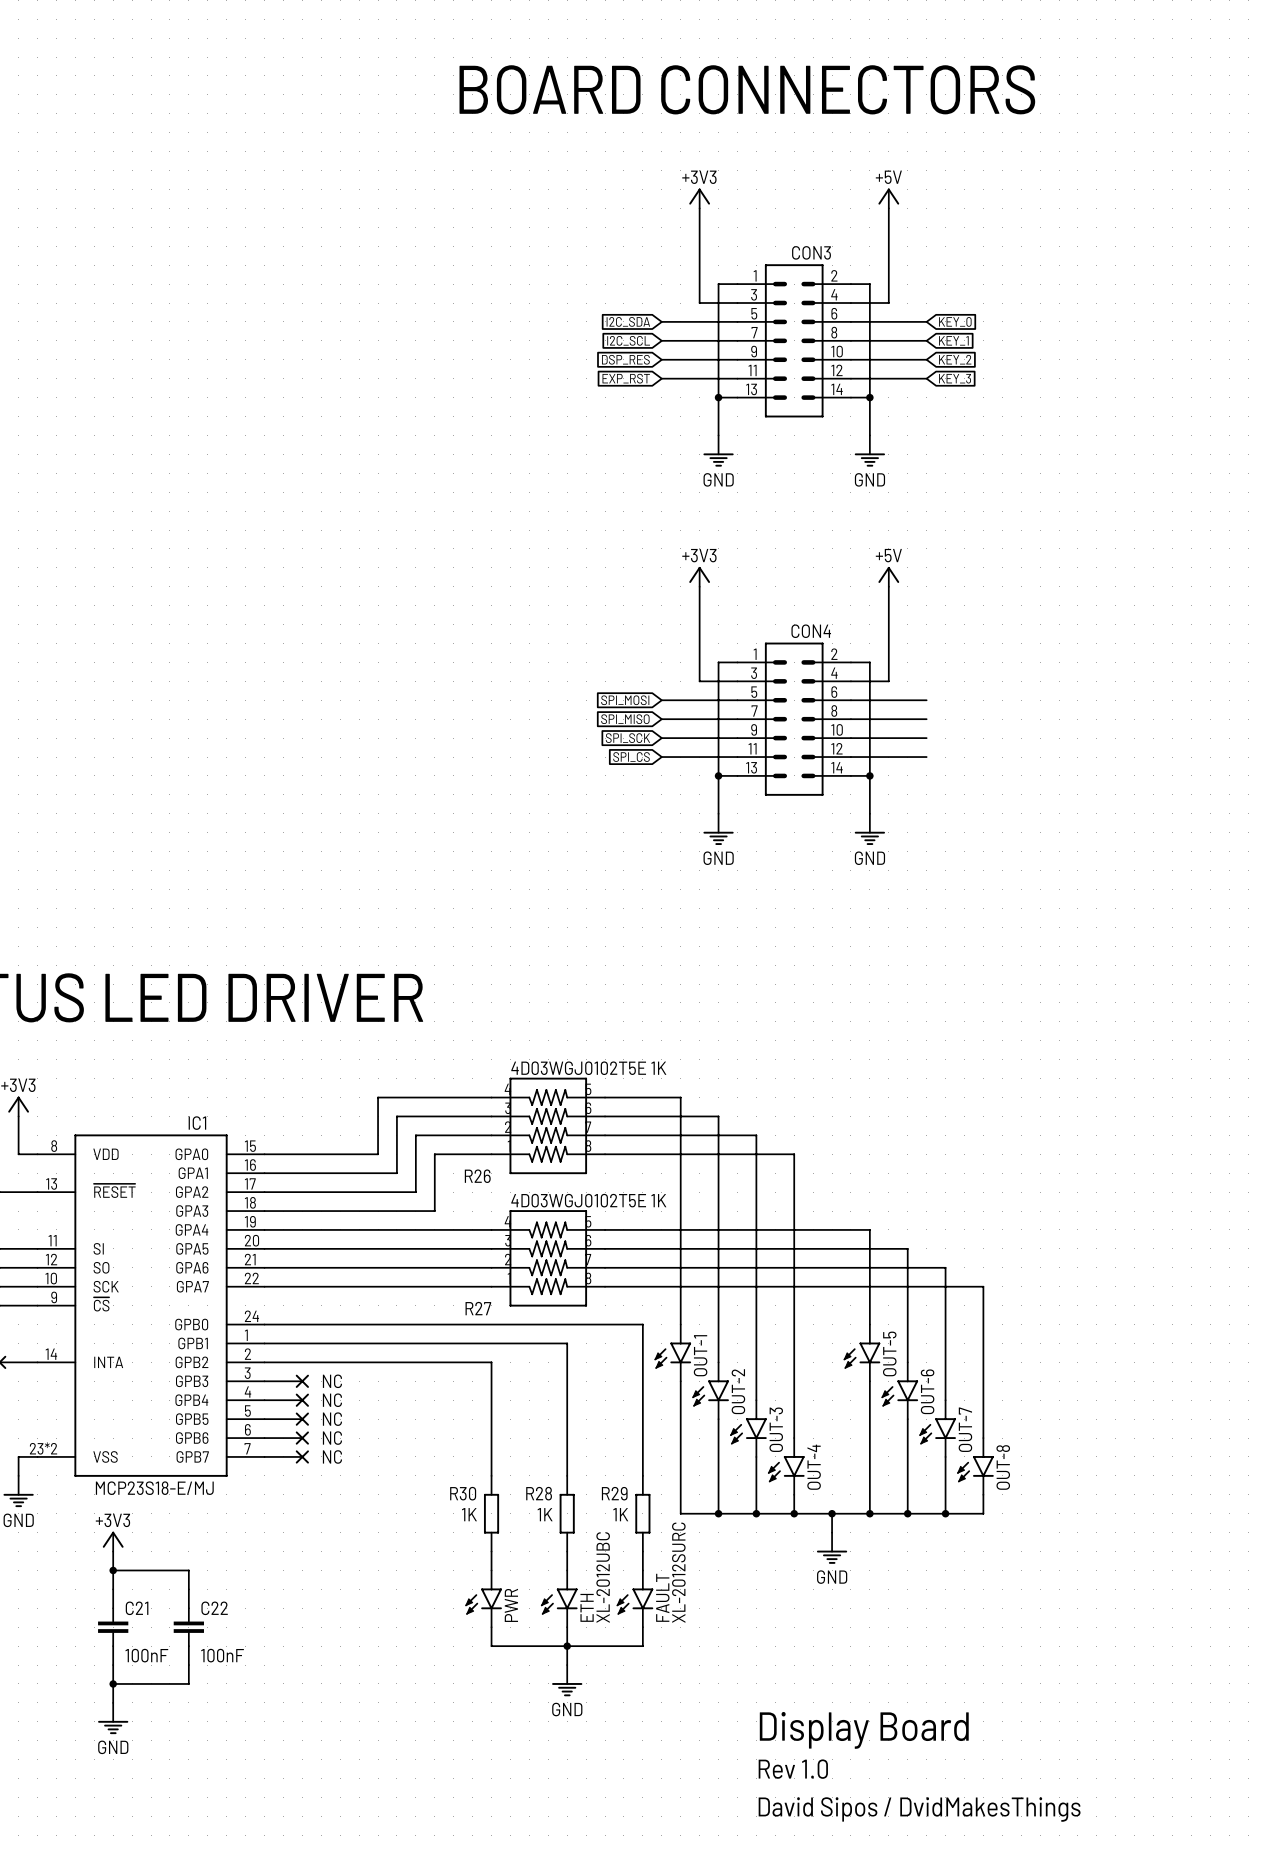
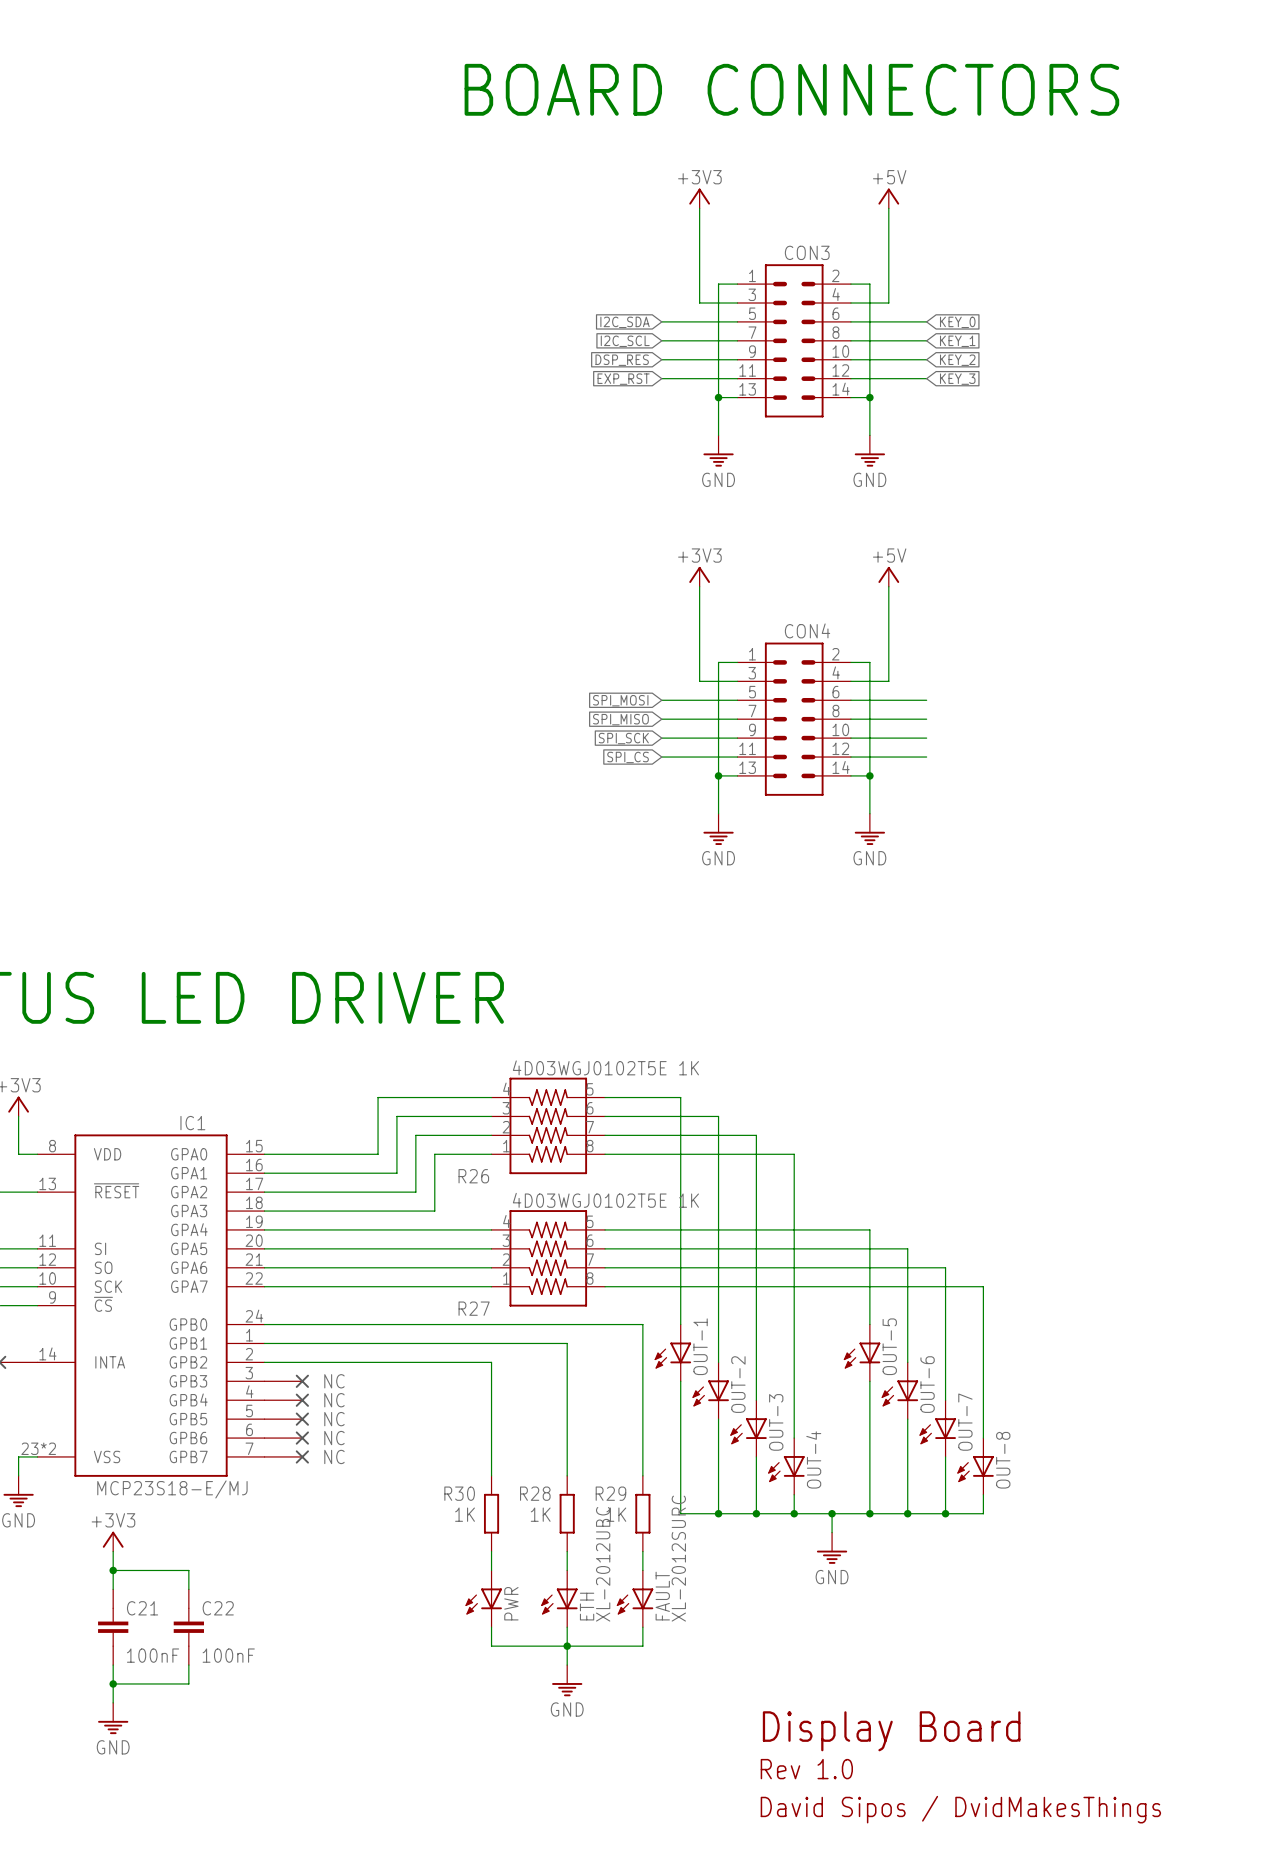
OUT-1 symbol: [654, 1324, 692, 1382] -> [654, 1324, 692, 1382]
OUT-5 symbol: [843, 1324, 881, 1382] -> [843, 1324, 881, 1382]
OUT-2 symbol: [692, 1362, 729, 1420] -> [692, 1362, 729, 1420]
OUT-6 symbol: [881, 1362, 919, 1420] -> [881, 1362, 919, 1420]
OUT-3 symbol: [730, 1400, 767, 1457] -> [730, 1400, 767, 1457]
OUT-7 symbol: [919, 1400, 956, 1457] -> [919, 1400, 956, 1457]
OUT-4 symbol: [768, 1438, 805, 1495] -> [768, 1438, 805, 1495]
OUT-8 symbol: [957, 1438, 994, 1495] -> [957, 1438, 994, 1495]
PWR symbol: [465, 1570, 502, 1628] -> [465, 1570, 502, 1628]
ETH symbol: [541, 1570, 578, 1628] -> [541, 1570, 578, 1628]
FAULT symbol: [616, 1570, 654, 1628] -> [616, 1570, 654, 1628]

